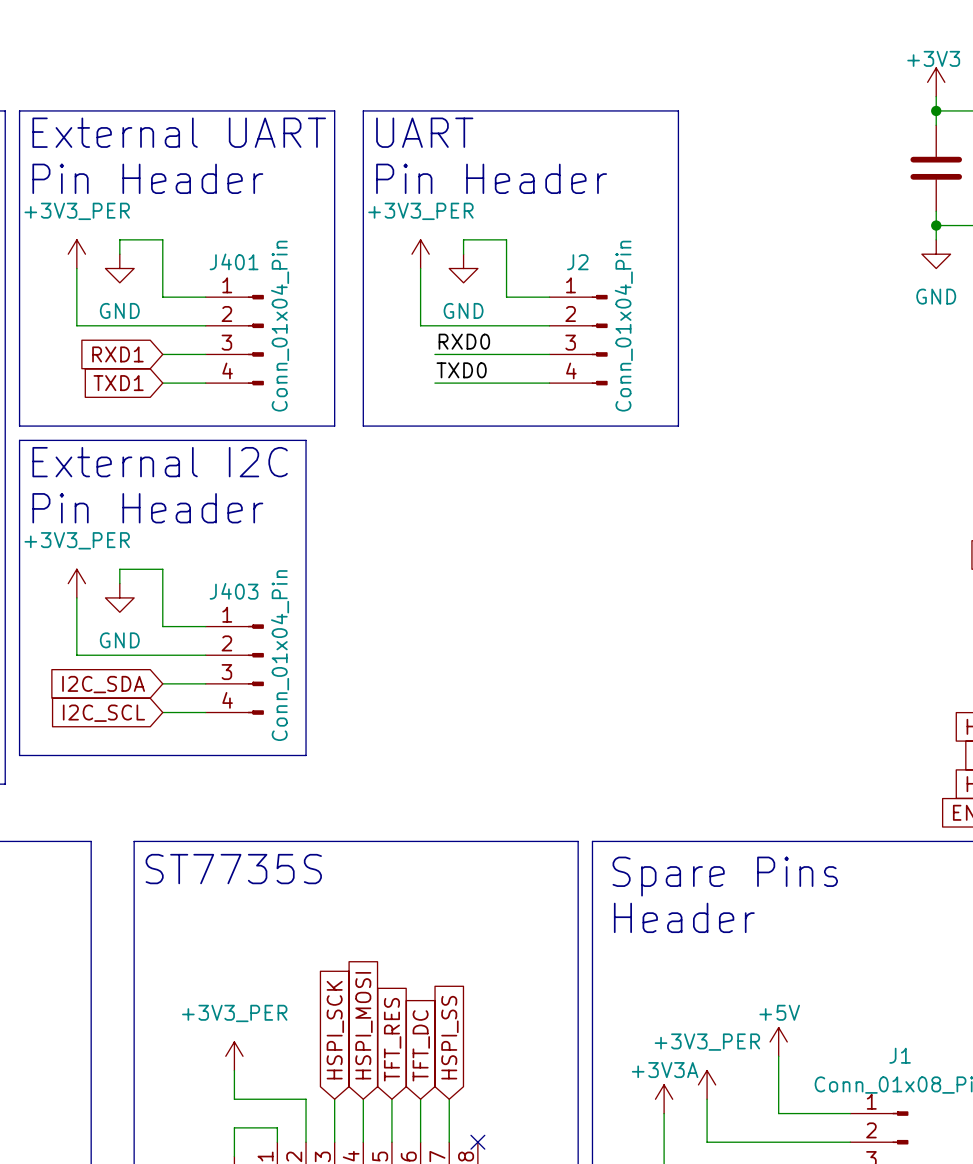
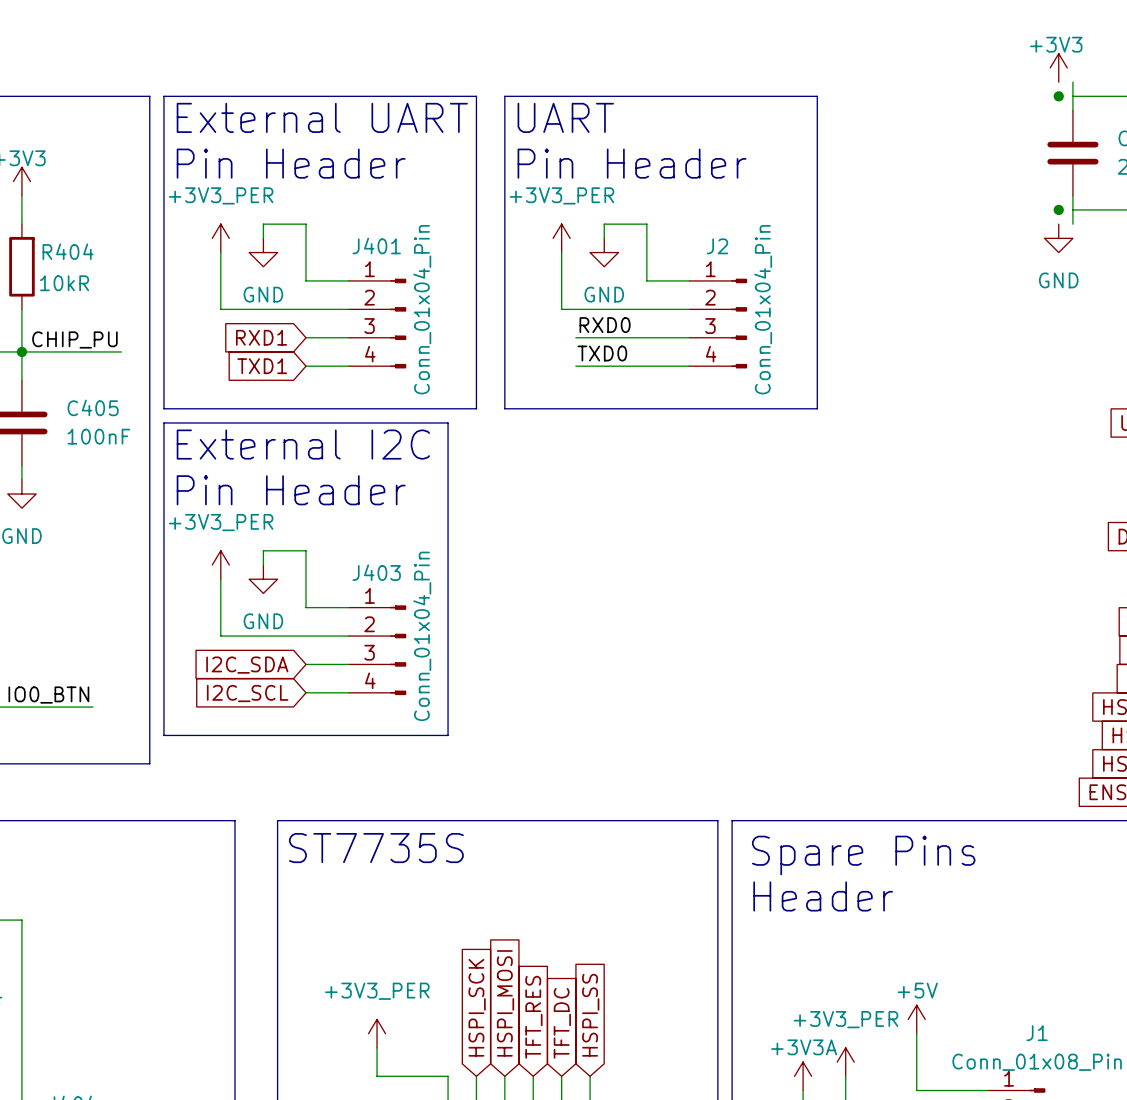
power symbol position: +3V3 (936, 82) -> +3V3 (1058, 67)
junction position: (936, 110) -> (1058, 96)
junction position: (936, 225) -> (1058, 209)
power symbol position: GND (936, 254) -> GND (1058, 238)

